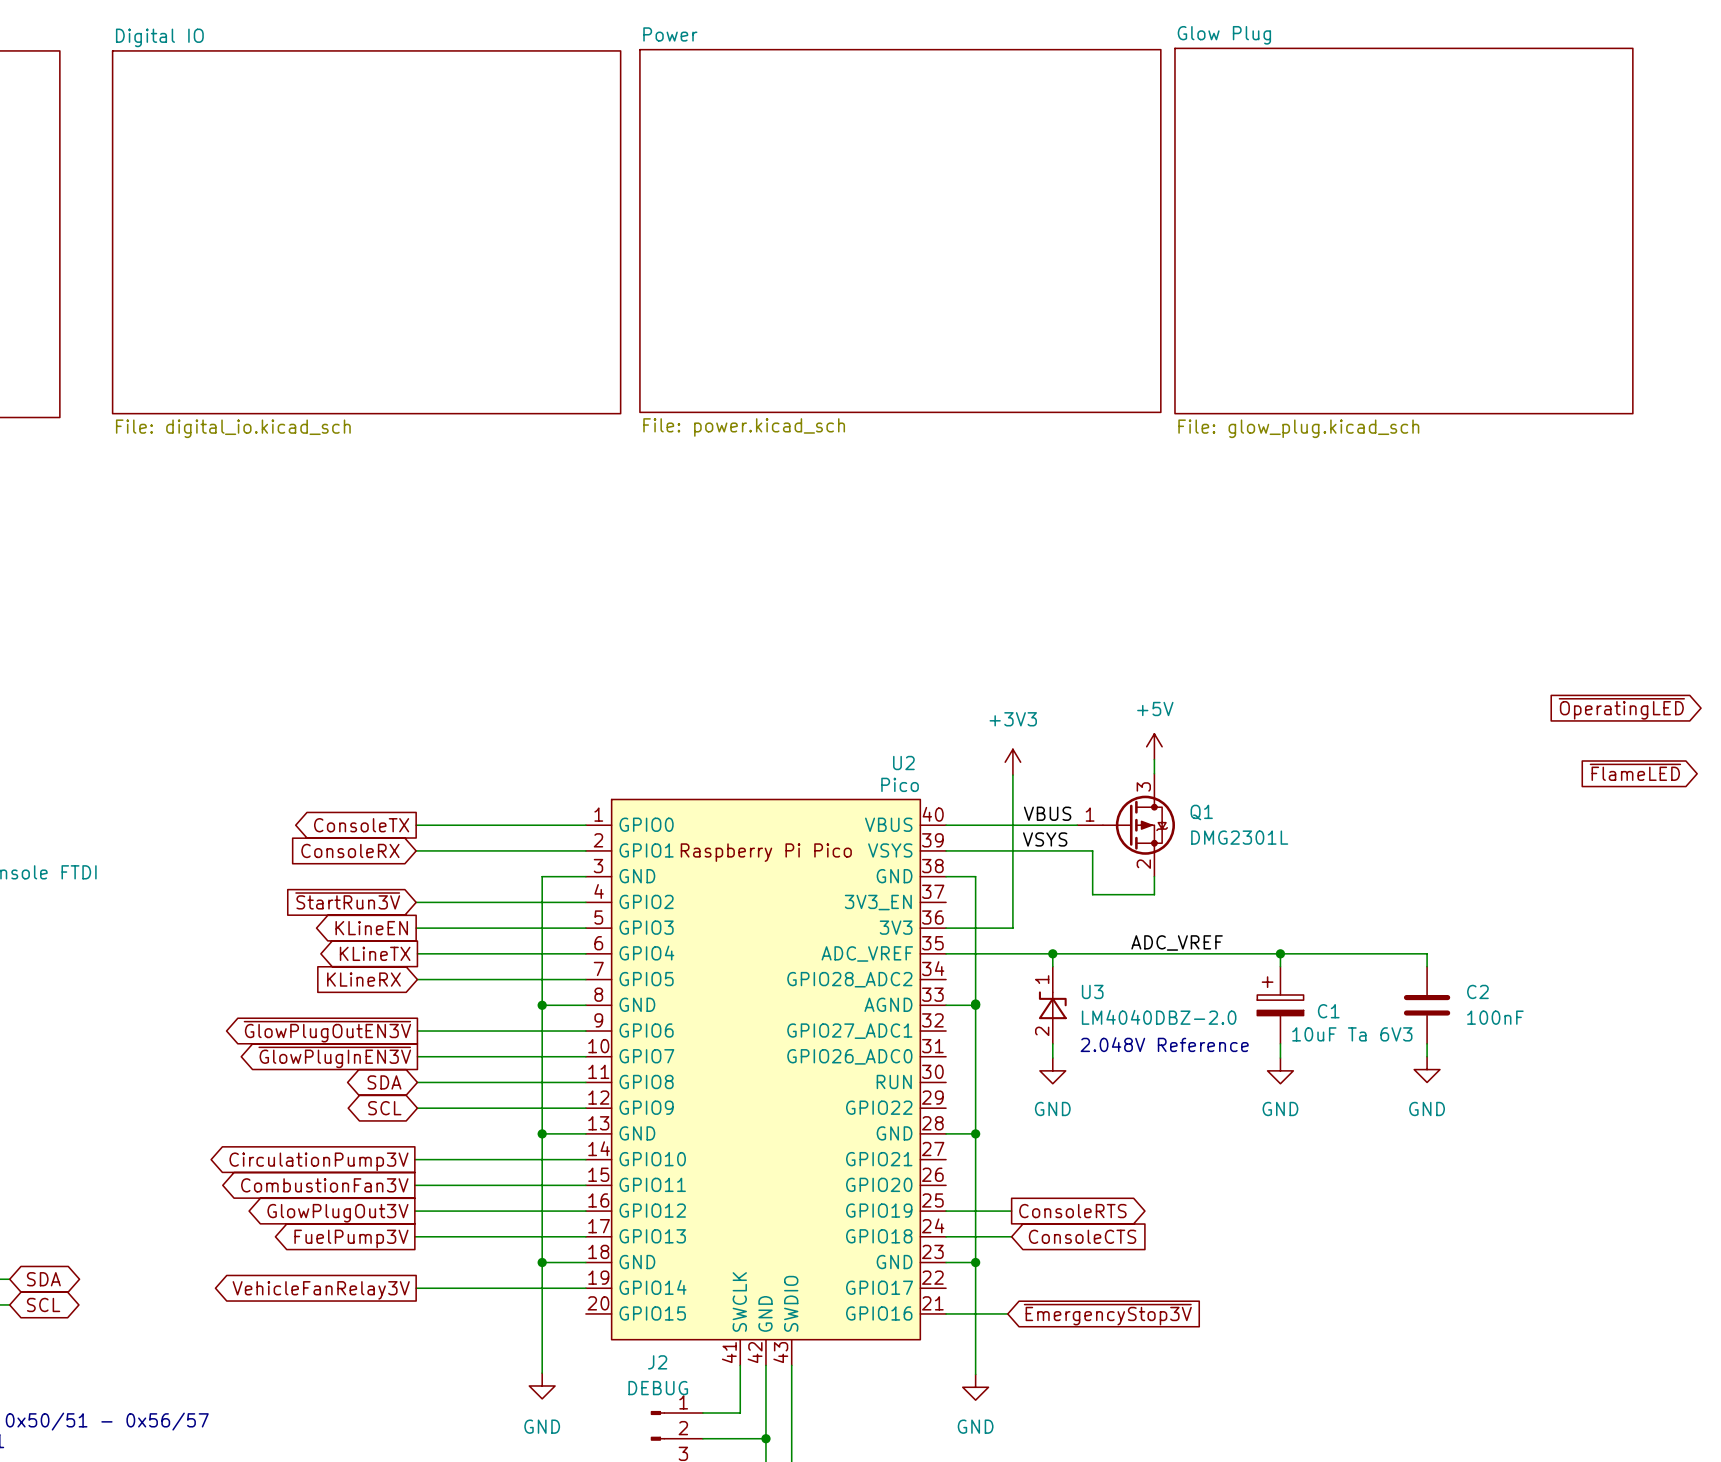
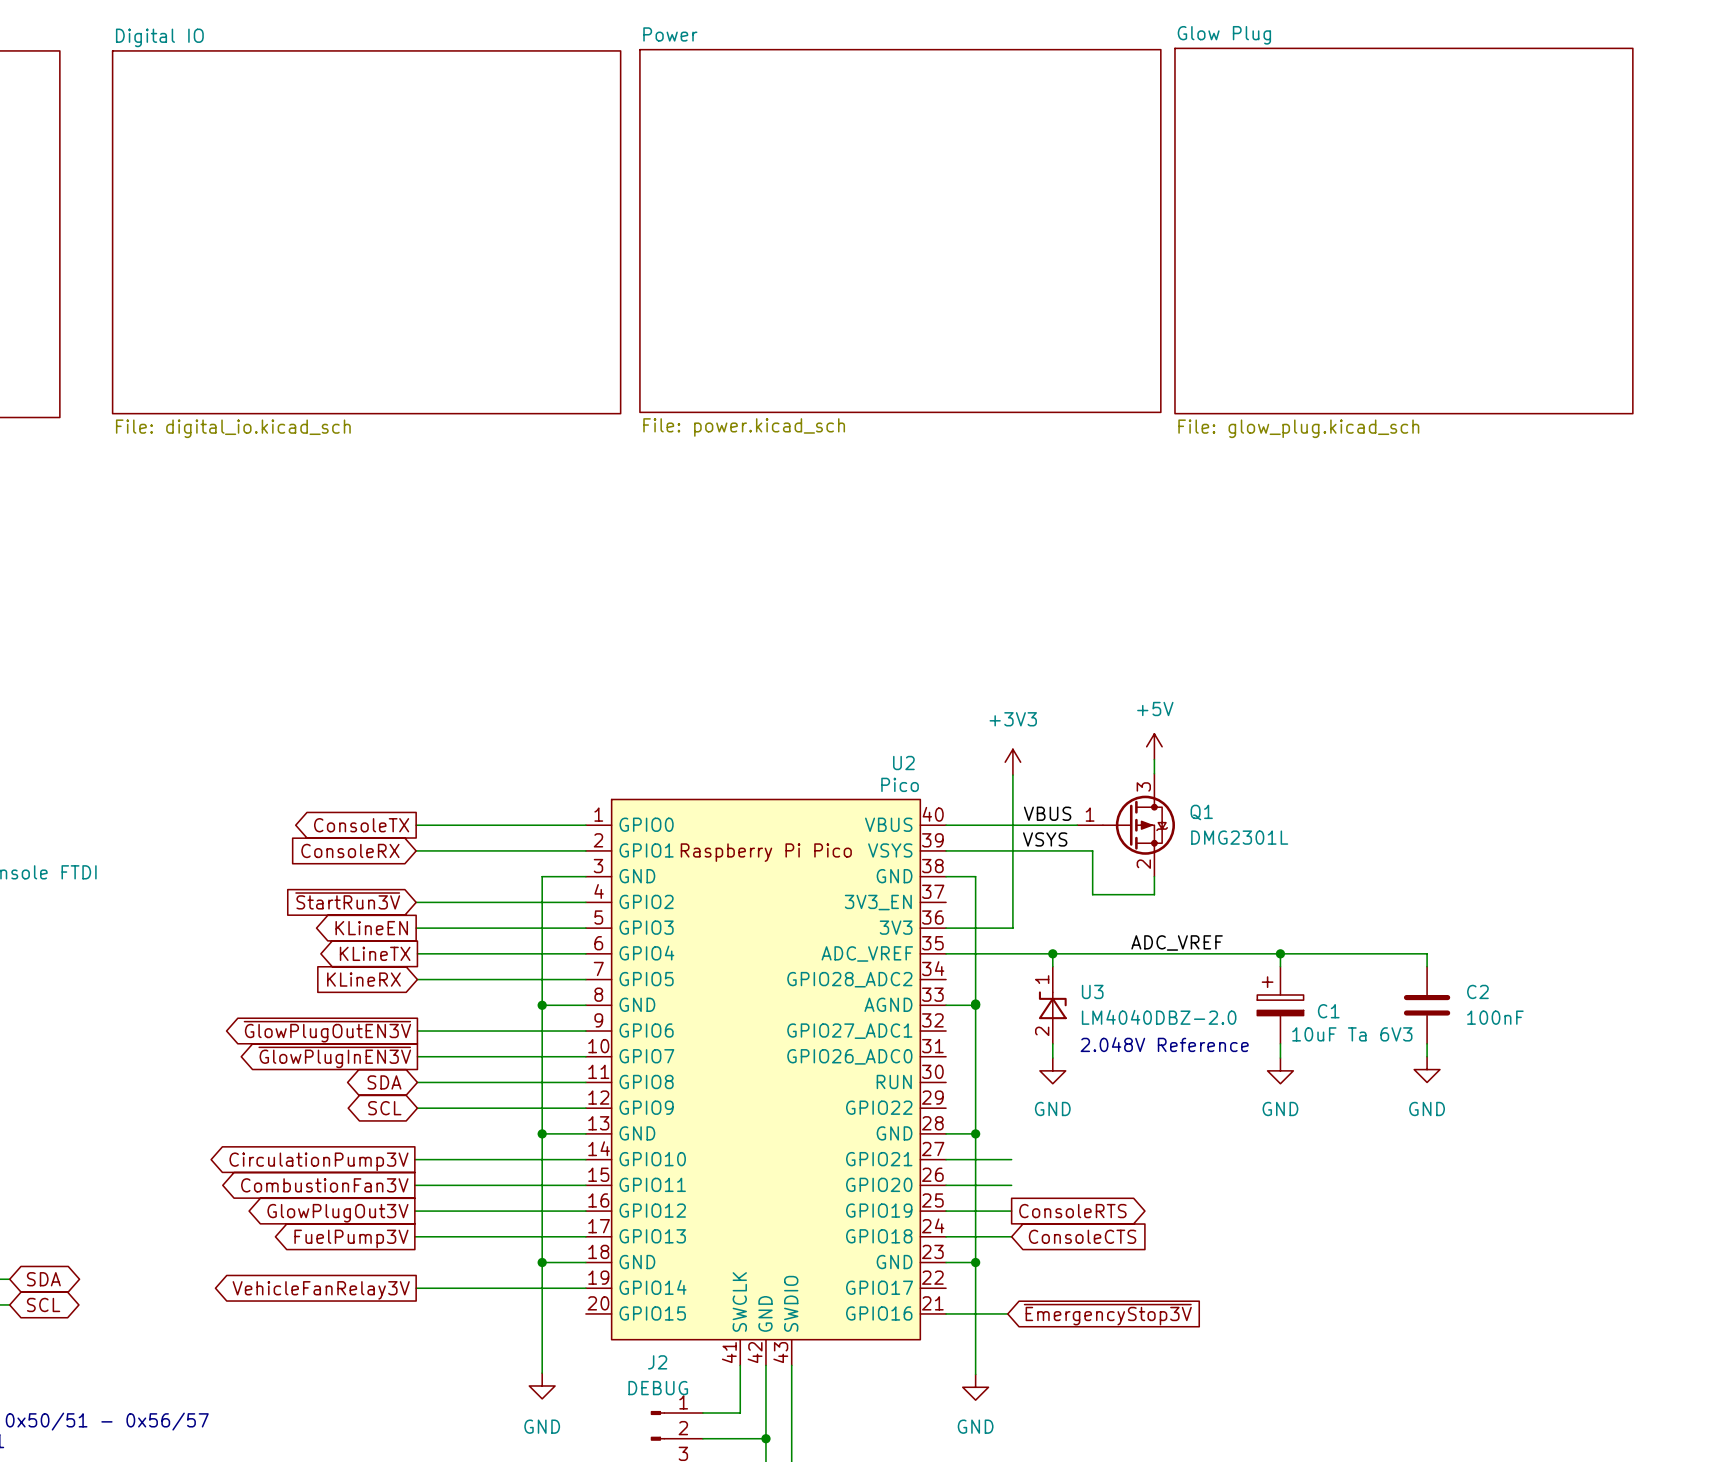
global label: ~{OperatingLED} (1621, 708) -> none
global label: ~{FlameLED} (1635, 772) -> none
wire: none -> (946, 1159) (1011, 1159)
wire: none -> (946, 1185) (1011, 1185)

